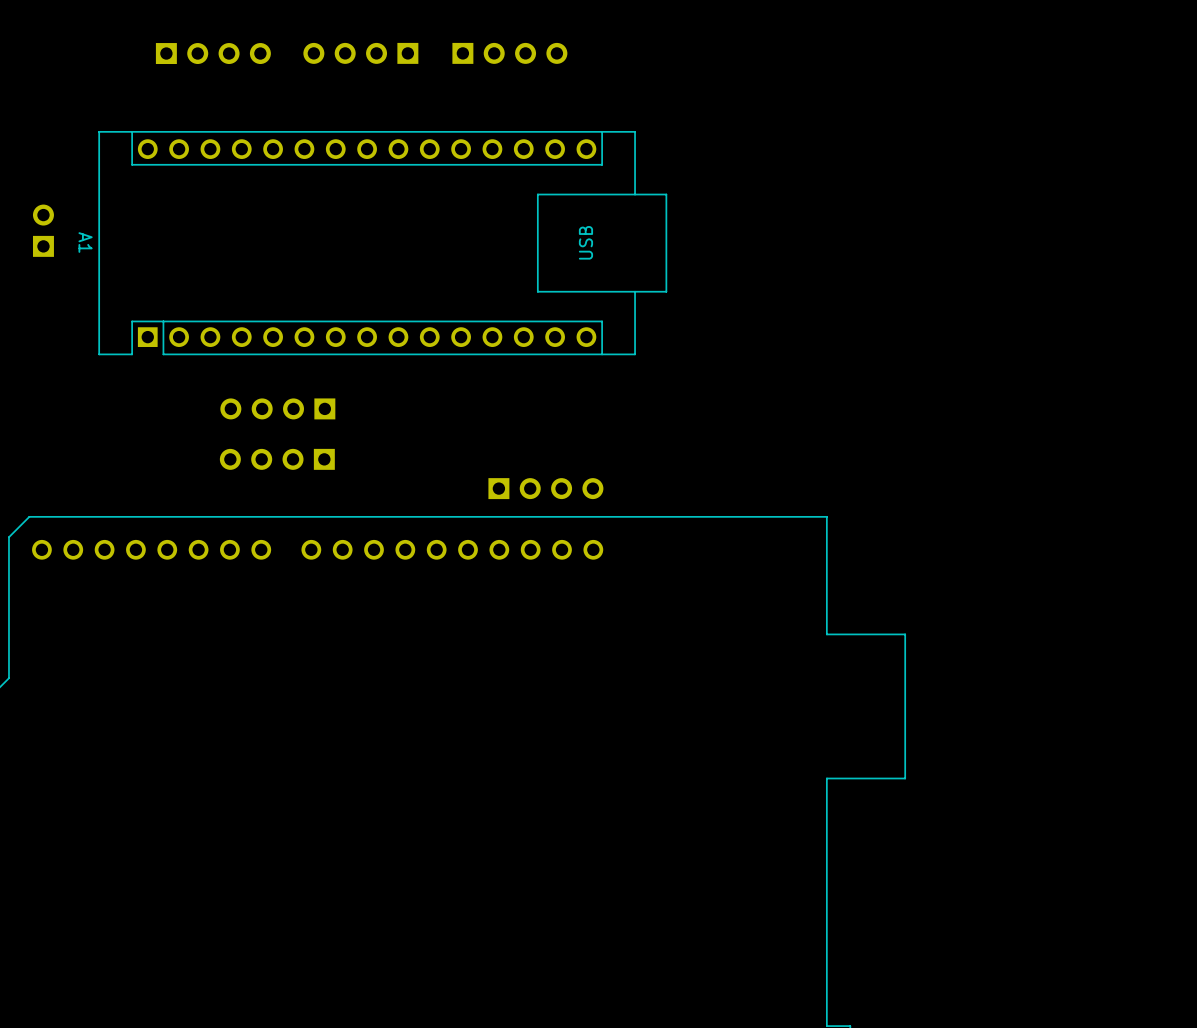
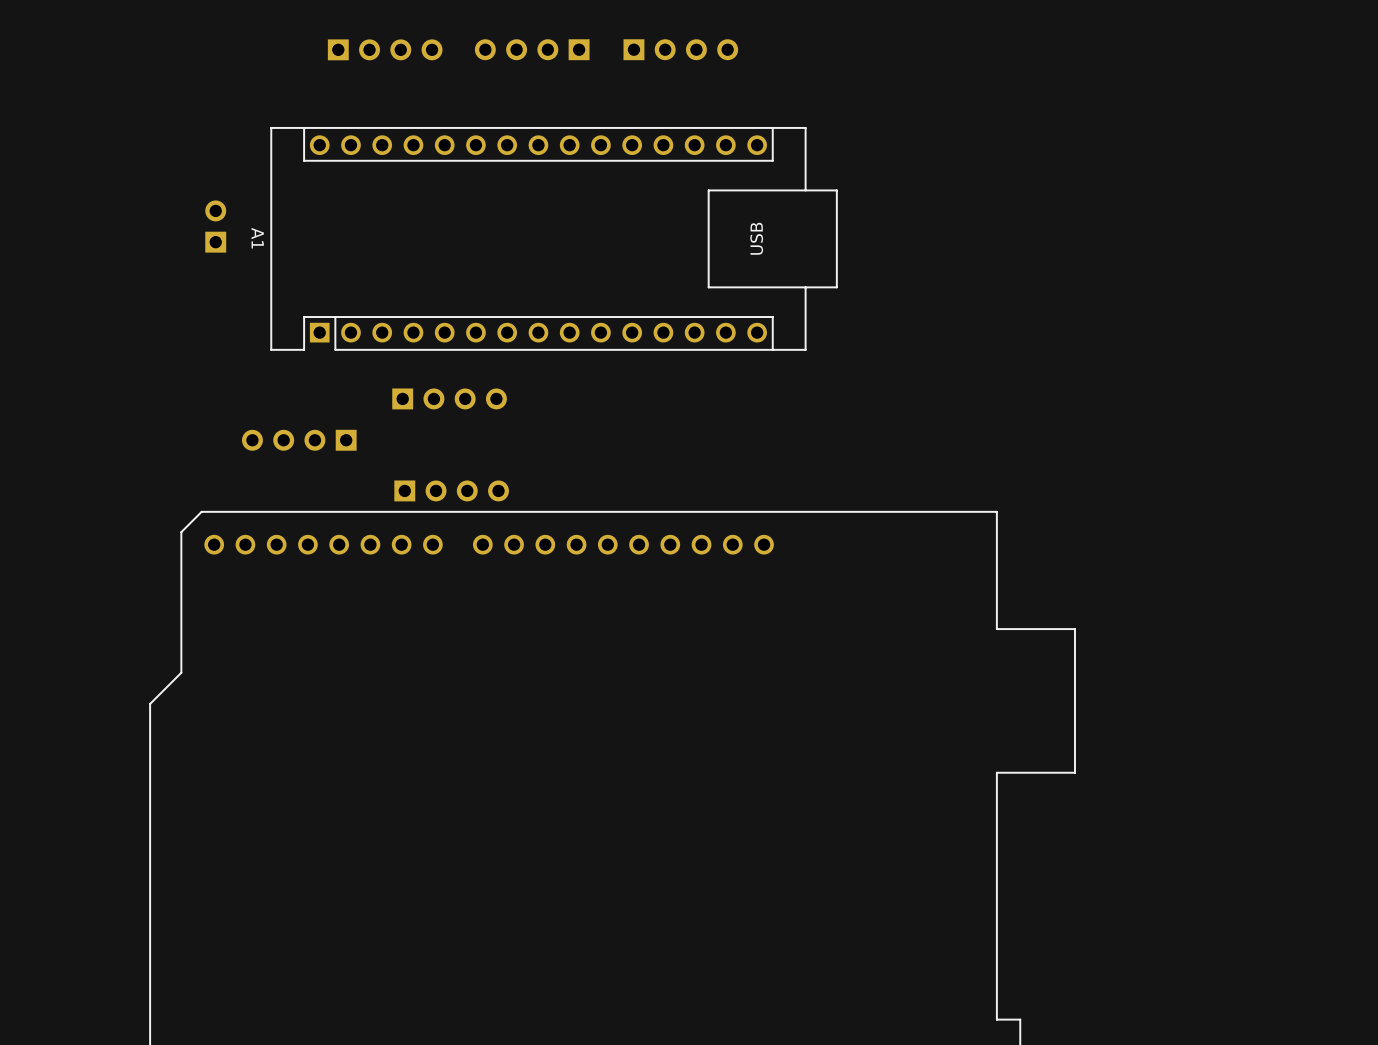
part rotation: 0° (277, 408) -> 180° (449, 398)
part: none -> (299, 440)
part rotation: 0° (277, 459) -> 180° (451, 490)
part: (545, 488) -> none

